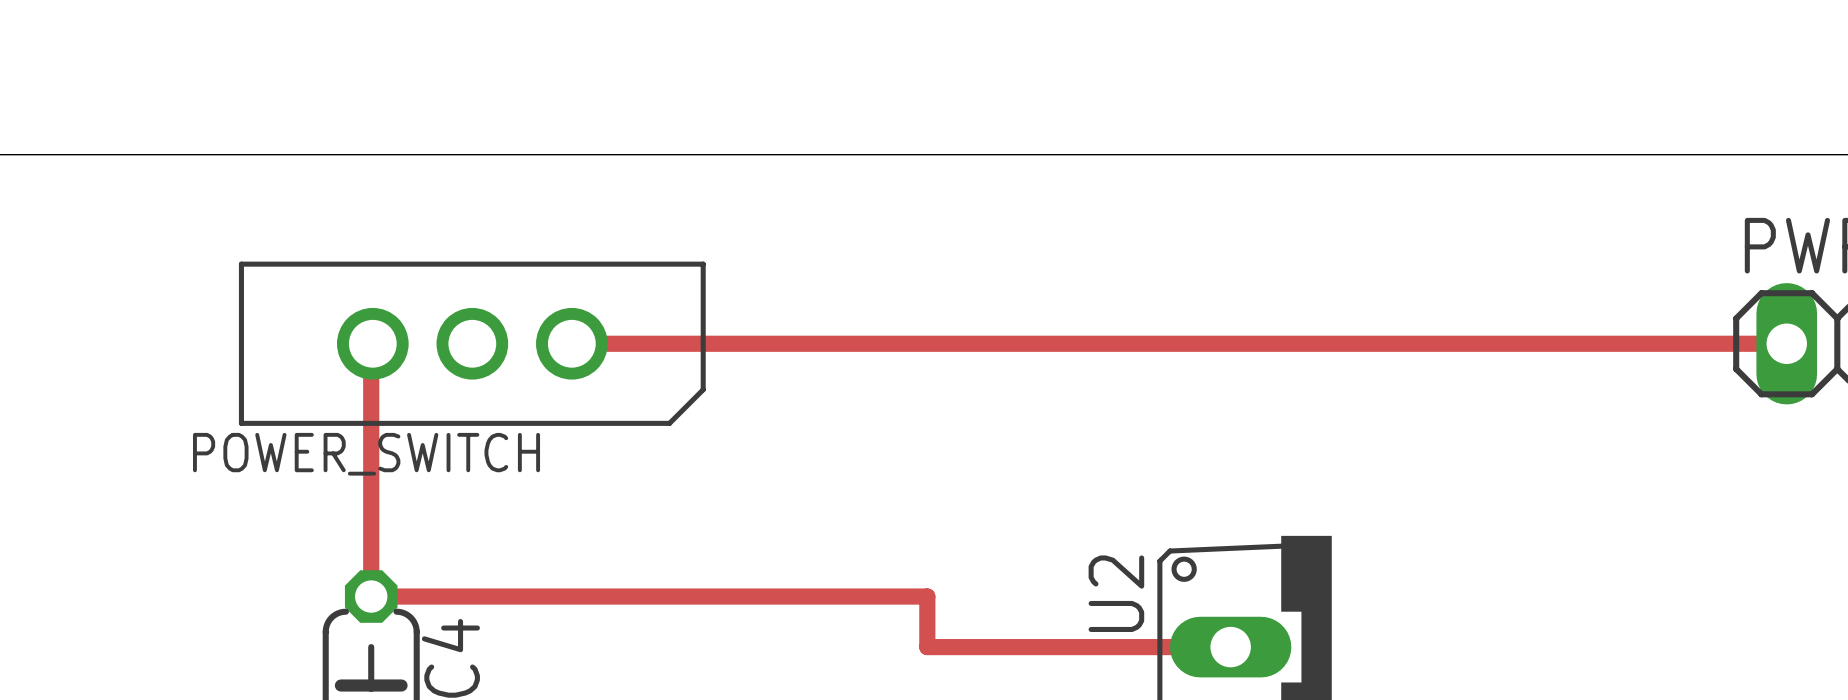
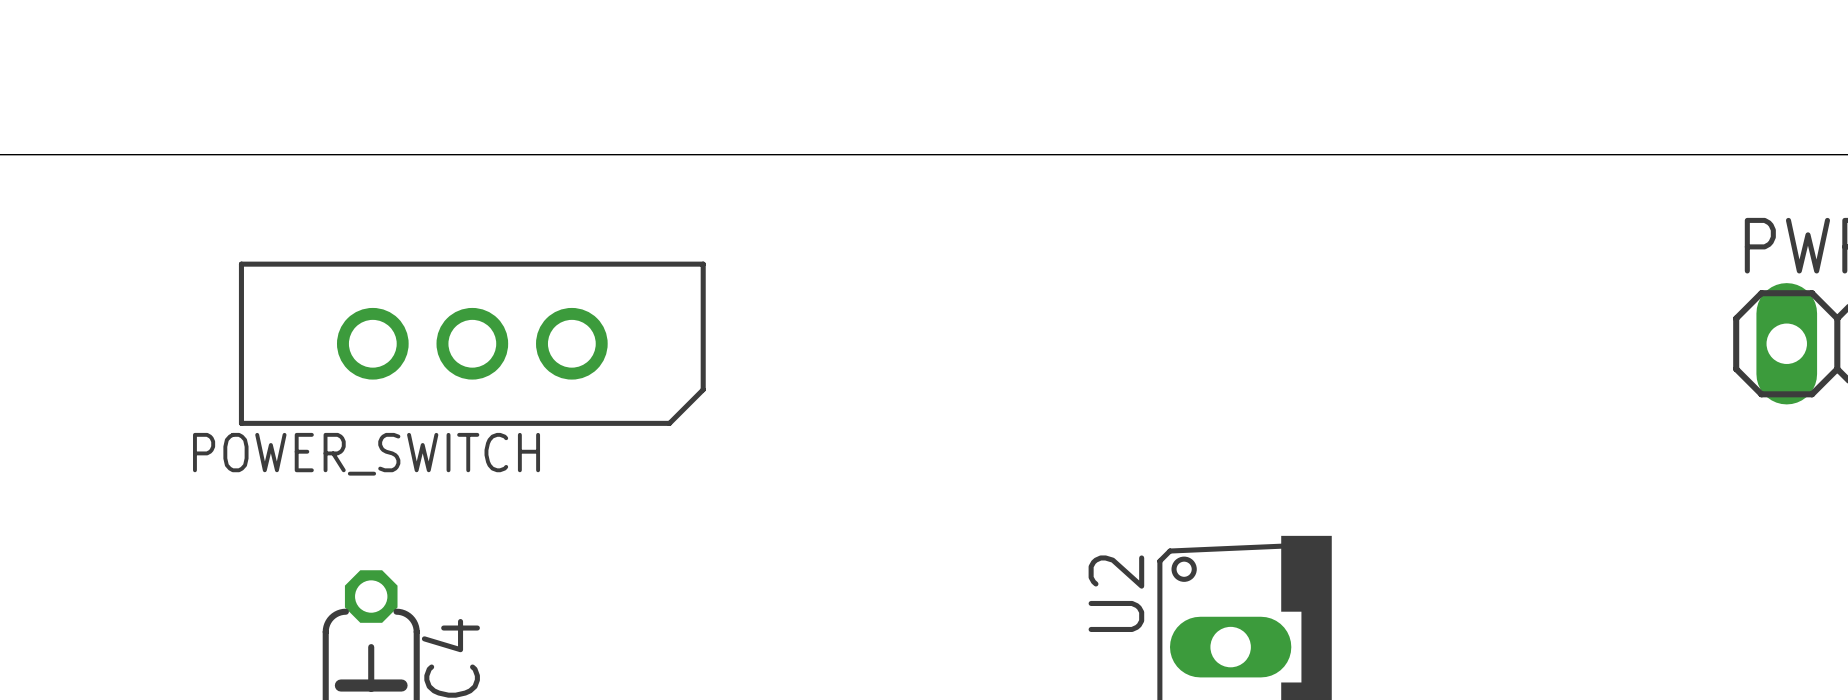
track: (372, 343) (371, 343) (371, 596) (927, 596) (927, 647) (1230, 647) -> none
track: (571, 343) (1786, 343) -> none

